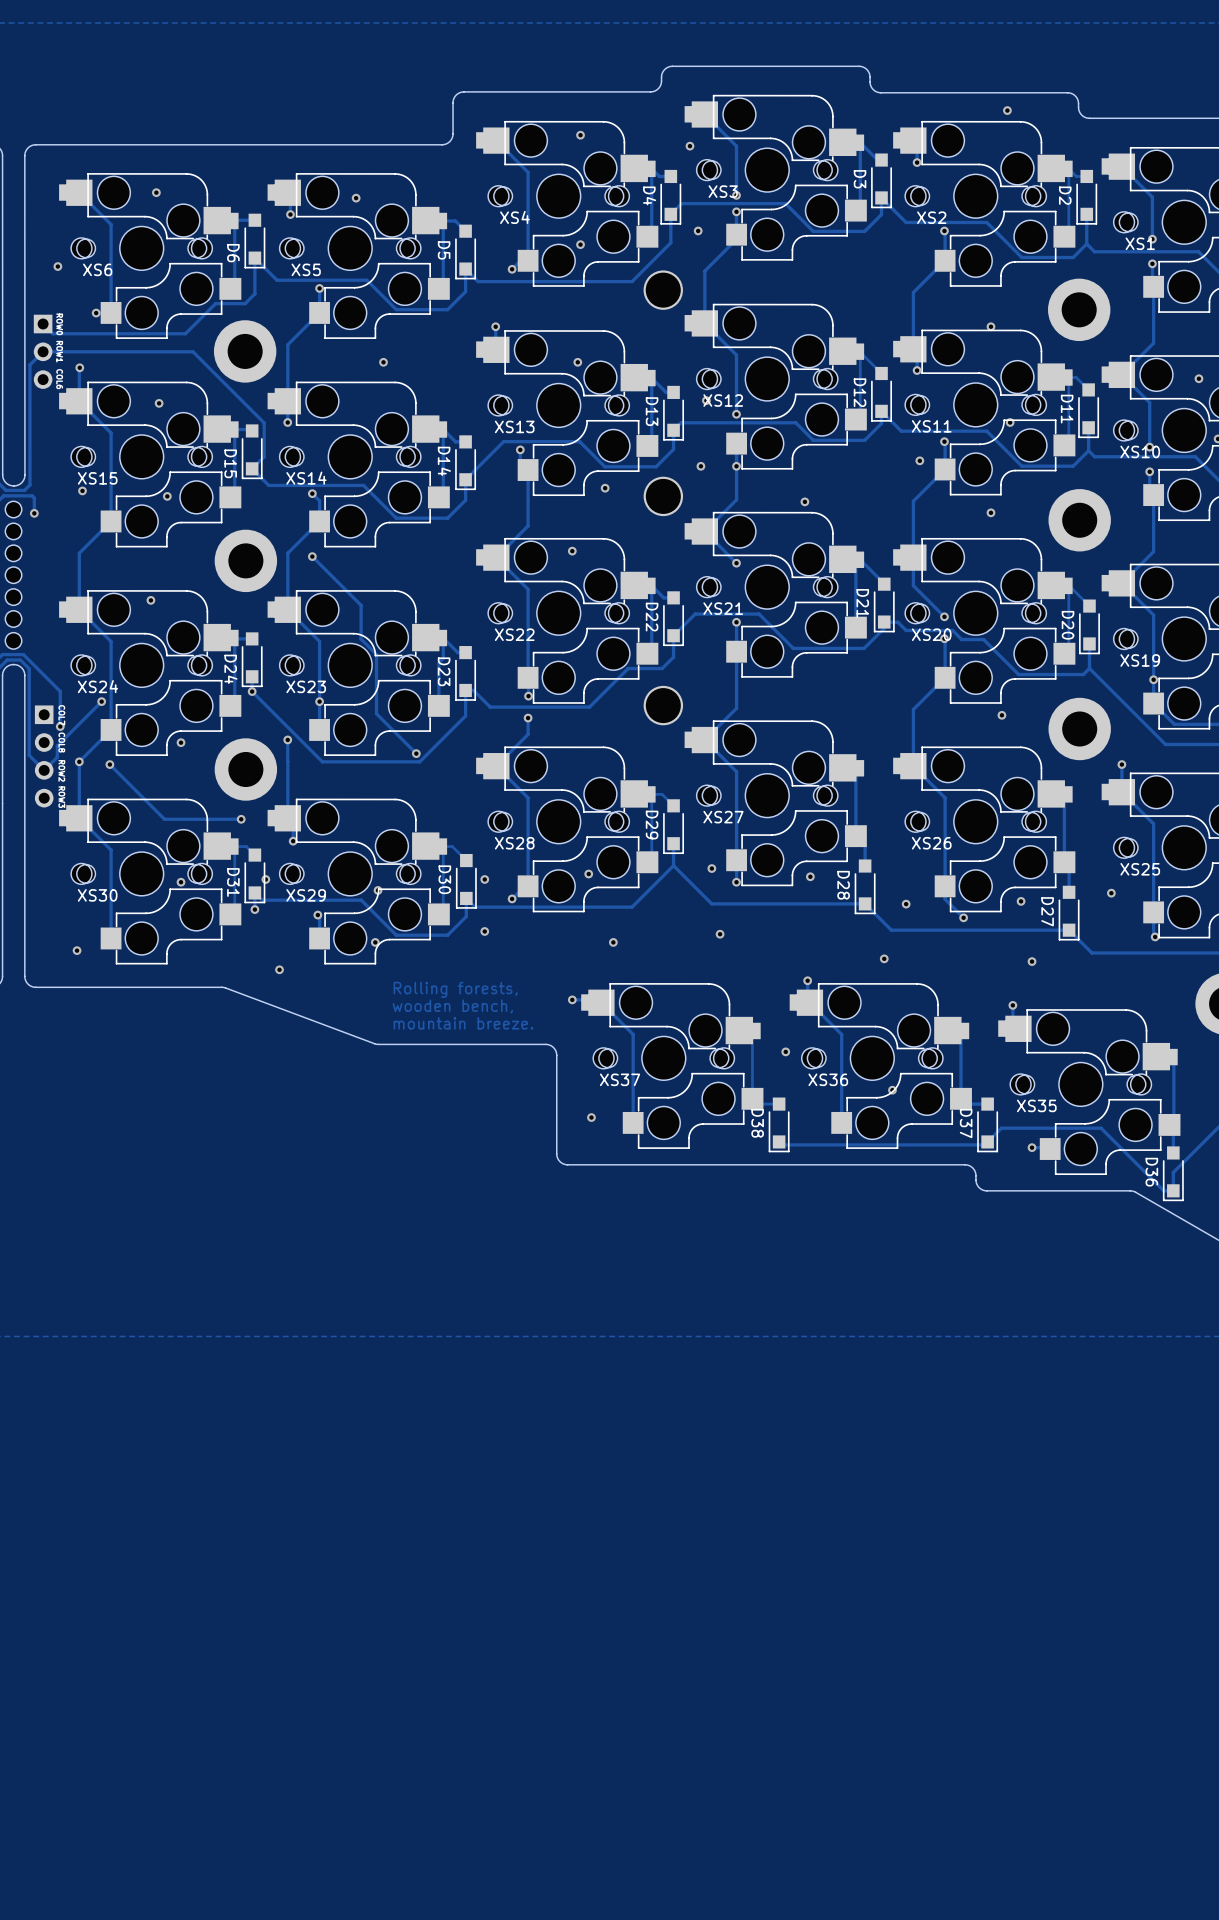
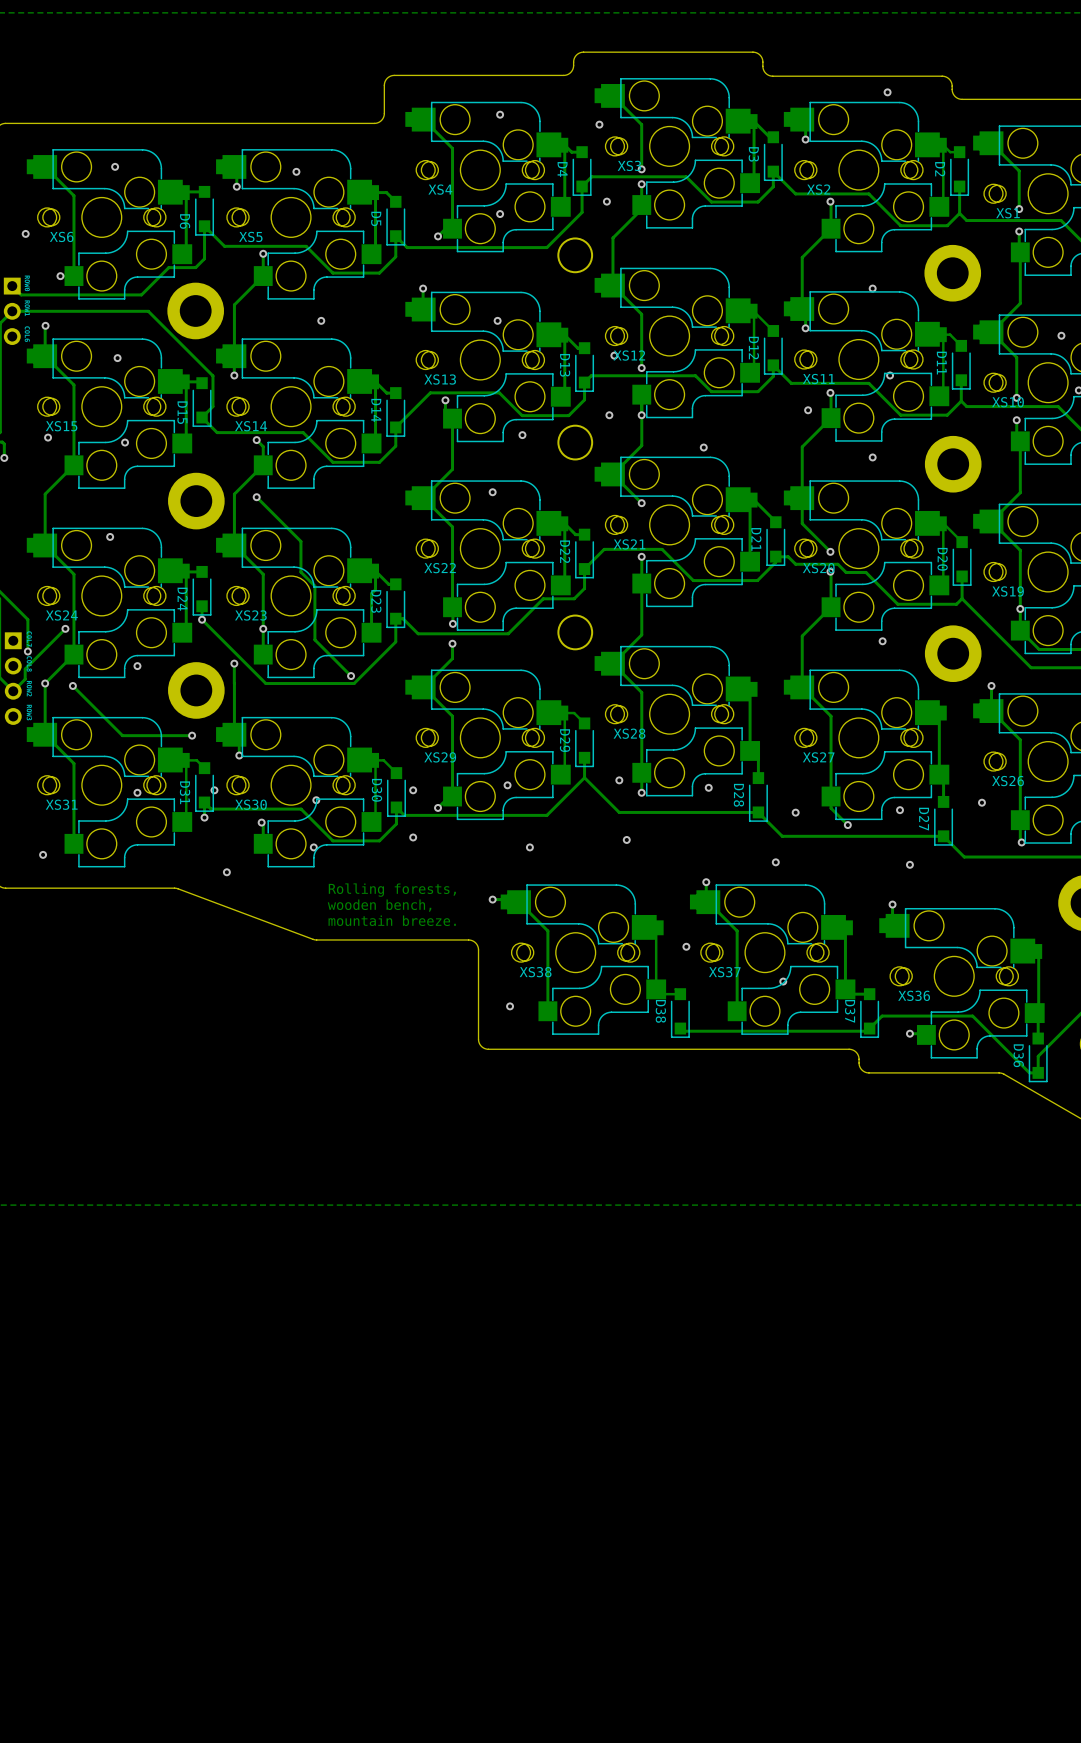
XS27 name: XS27 (723, 817) -> XS28 (629, 733)
XS28 name: XS28 (514, 843) -> XS29 (440, 757)
XS26 name: XS26 (931, 843) -> XS27 (818, 757)
XS25 name: XS25 (1140, 869) -> XS26 (1008, 781)
XS30 name: XS30 (97, 895) -> XS31 (61, 804)
XS29 name: XS29 (306, 895) -> XS30 (250, 804)
XS37 name: XS37 (620, 1079) -> XS38 (535, 972)
XS36 name: XS36 (828, 1079) -> XS37 (724, 972)
XS35 name: XS35 (1036, 1105) -> XS36 (914, 995)

